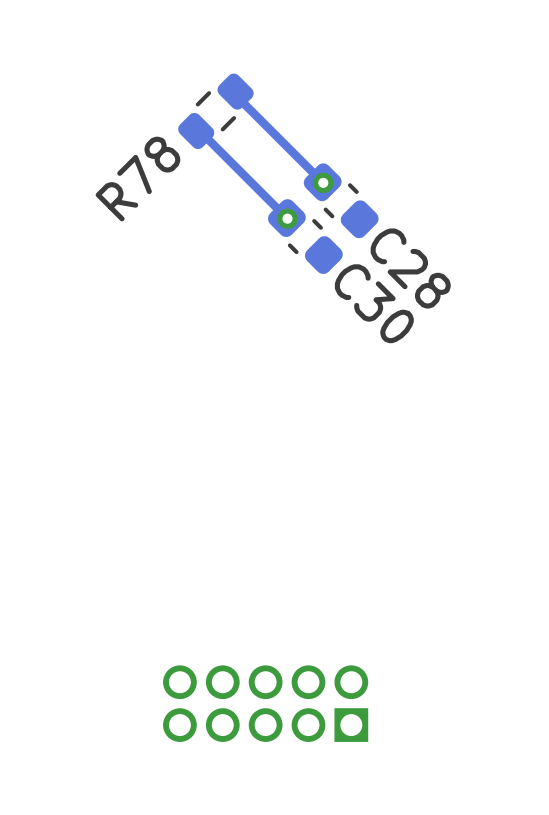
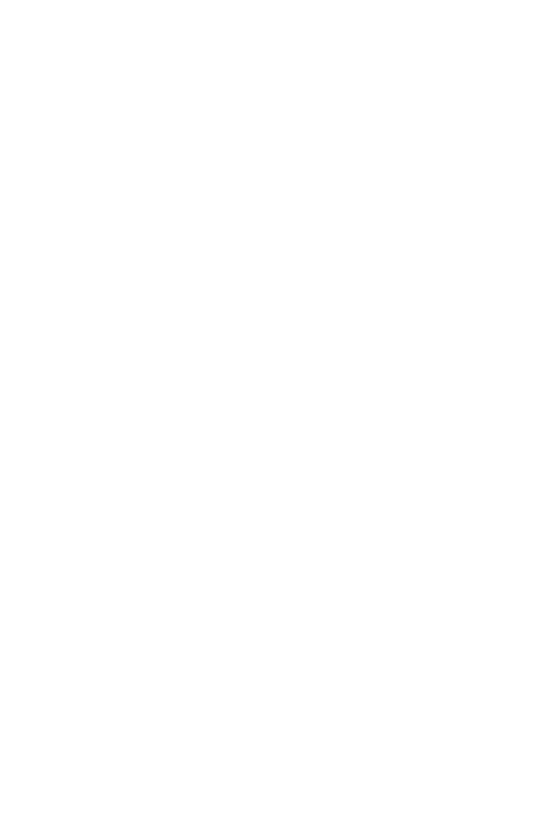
track: (235, 91) (235, 95) (322, 182) -> none
R78: (215, 111) -> none
track: (196, 130) (199, 130) (286, 218) -> none
via: (323, 182) -> none
C28: (341, 200) -> none
via: (287, 218) -> none
C30: (305, 236) -> none
part: (265, 703) -> none

